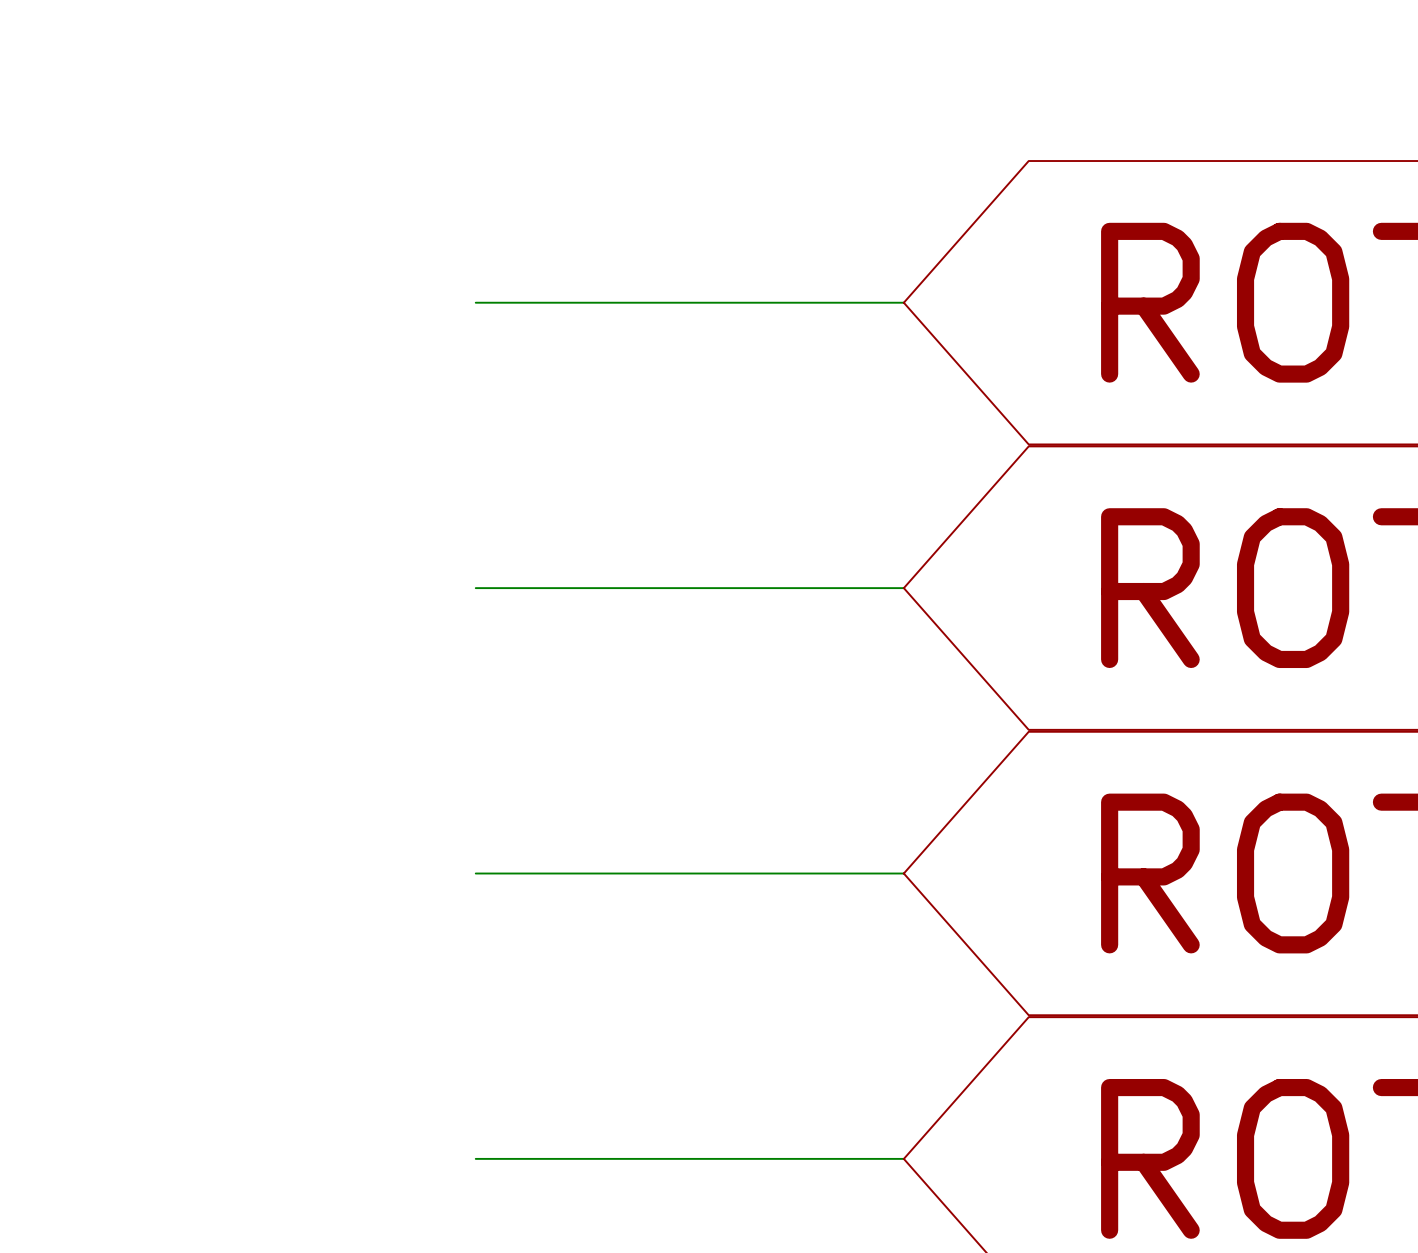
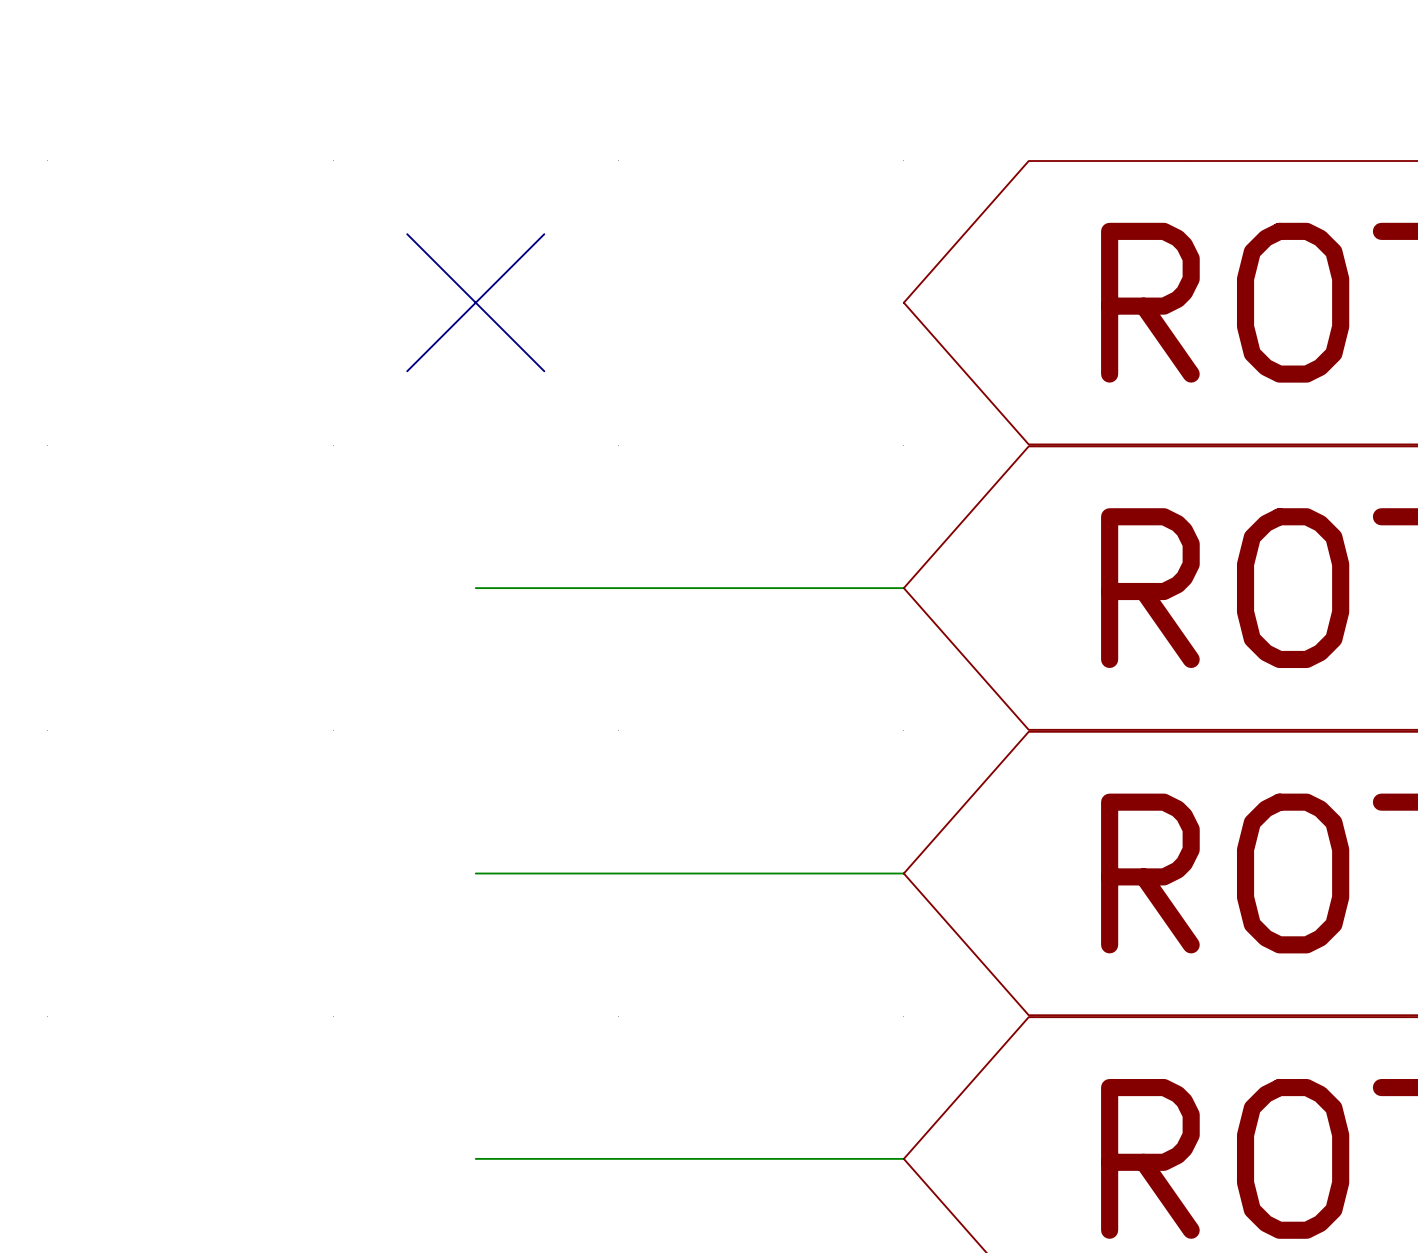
wire: (475, 302) (903, 302) -> none
no-connect mark: none -> (475, 302)

